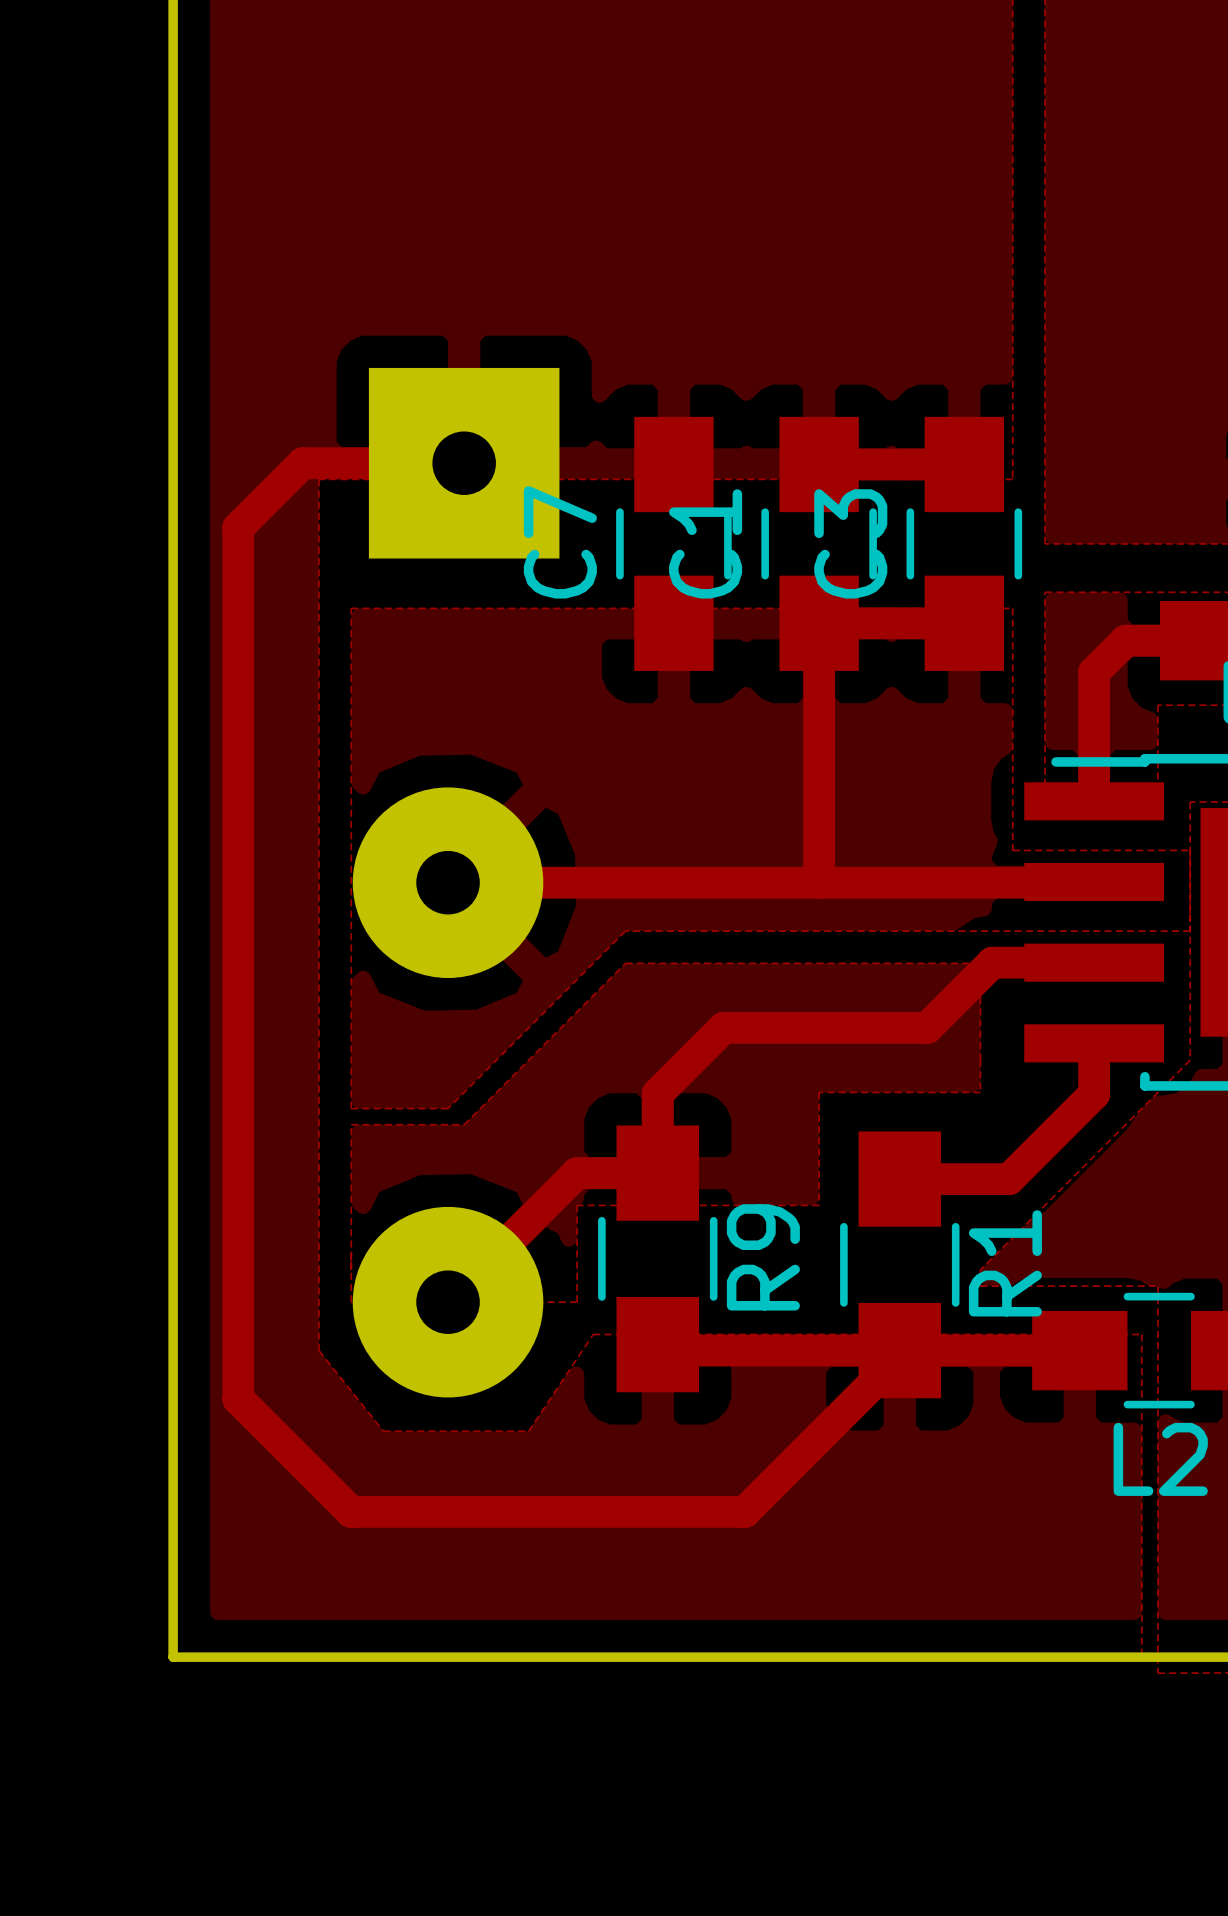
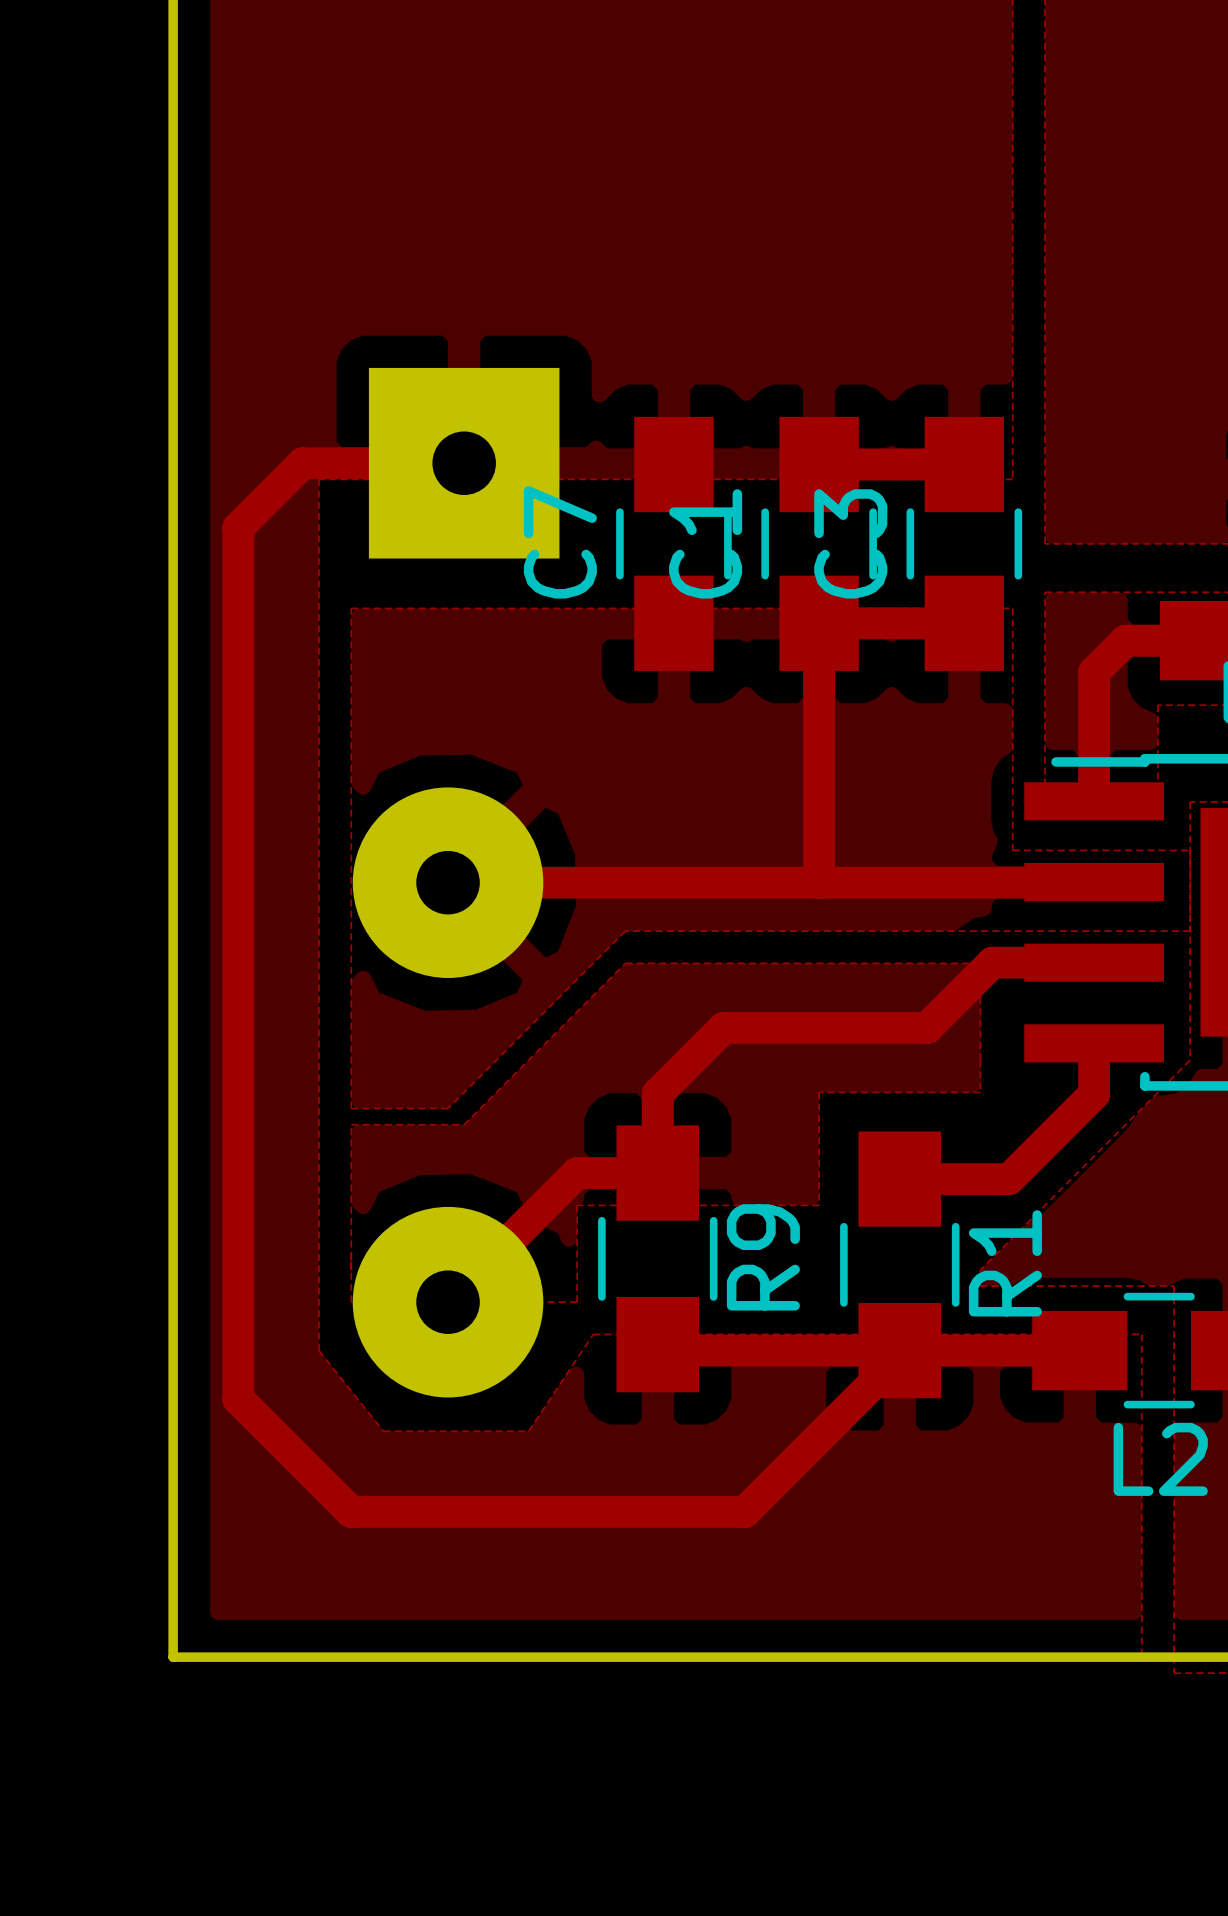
zone outline: (1157, 1286) (1157, 1673) (1174, 1673) -> (1157, 1286) (1174, 1286) (1174, 1673)

